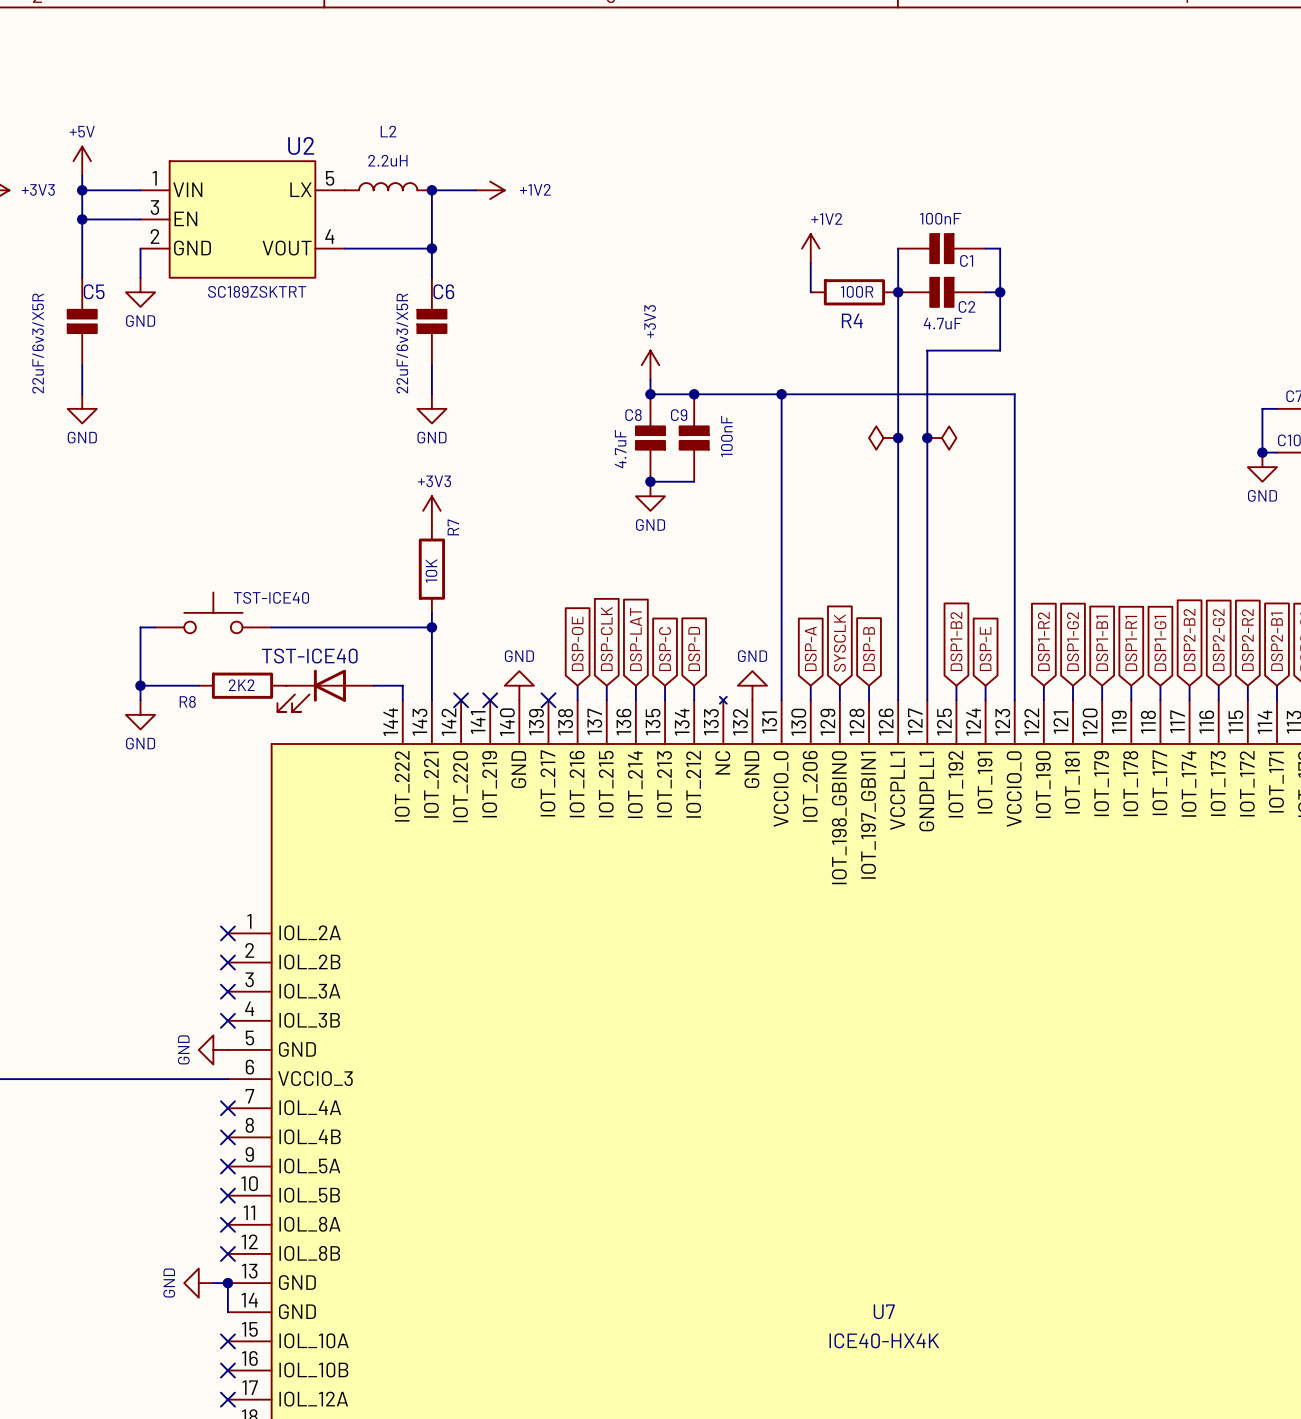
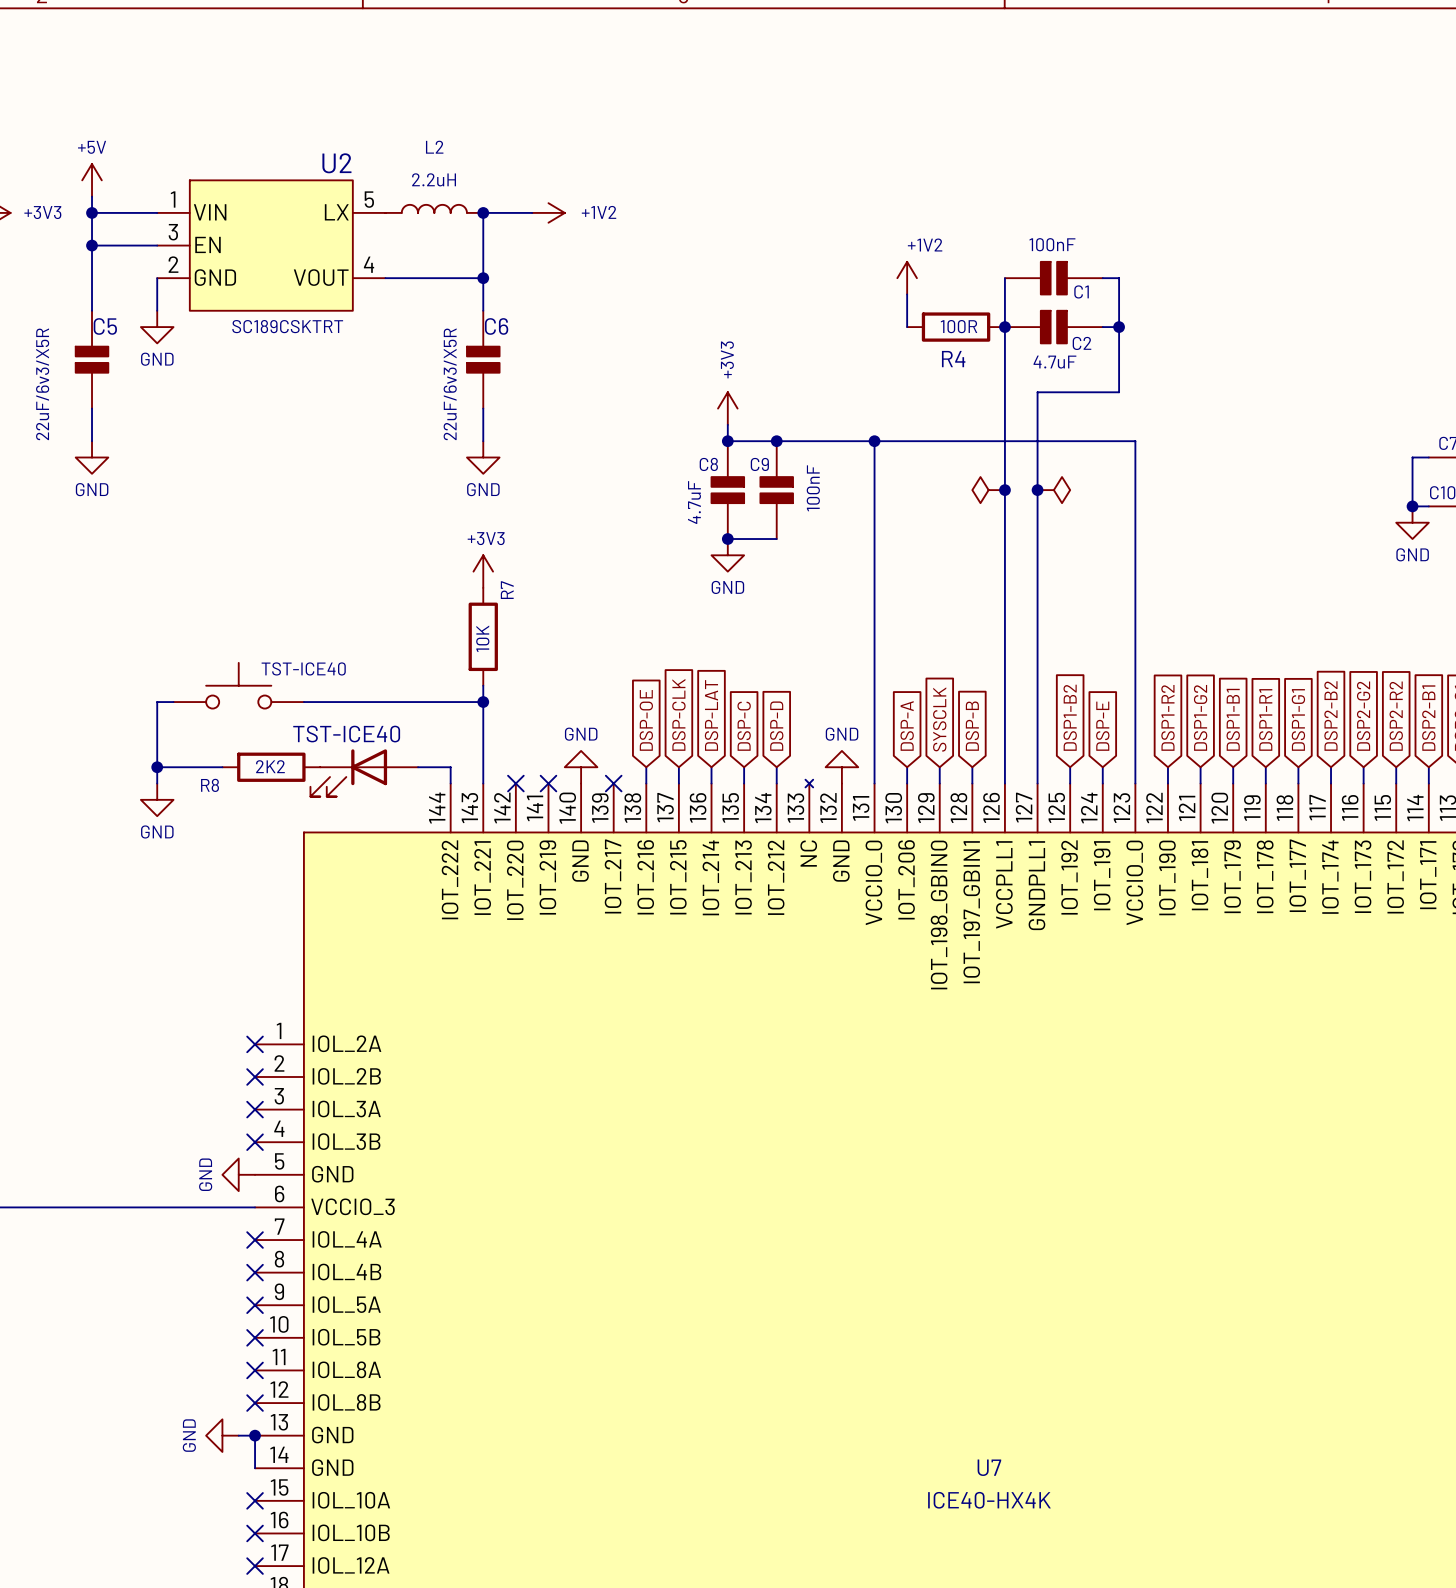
U2 value: SC189ZSKTRT (257, 291) -> SC189CSKTRT (287, 326)

